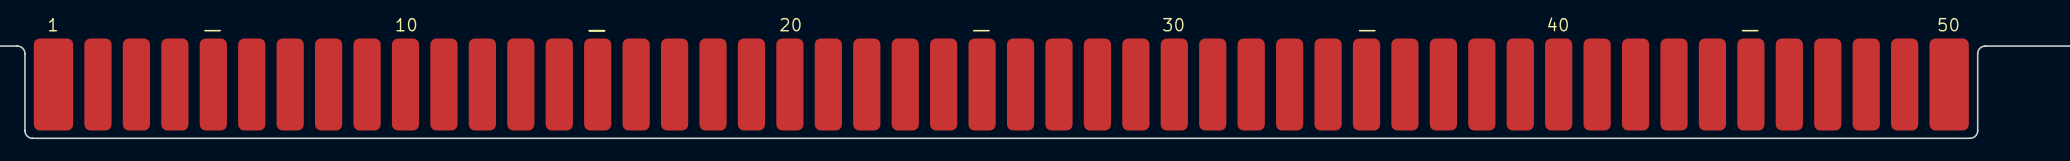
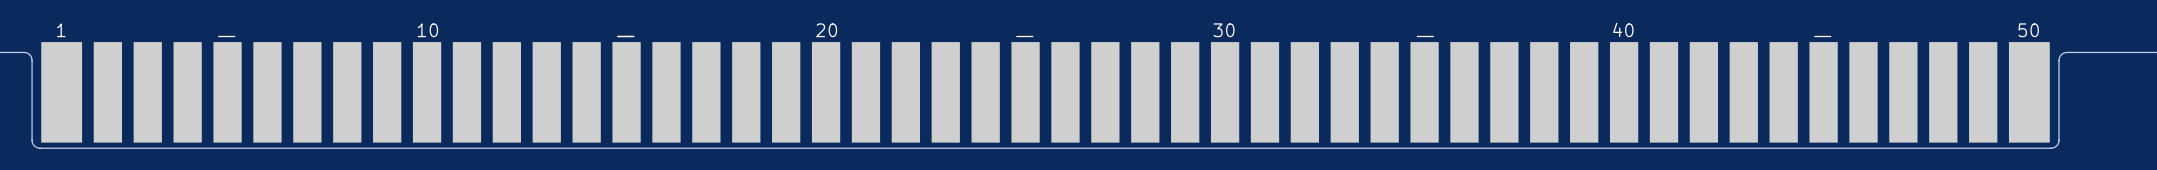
part footprint: [33, 38, 1969, 131] -> [41, 42, 2050, 143]

